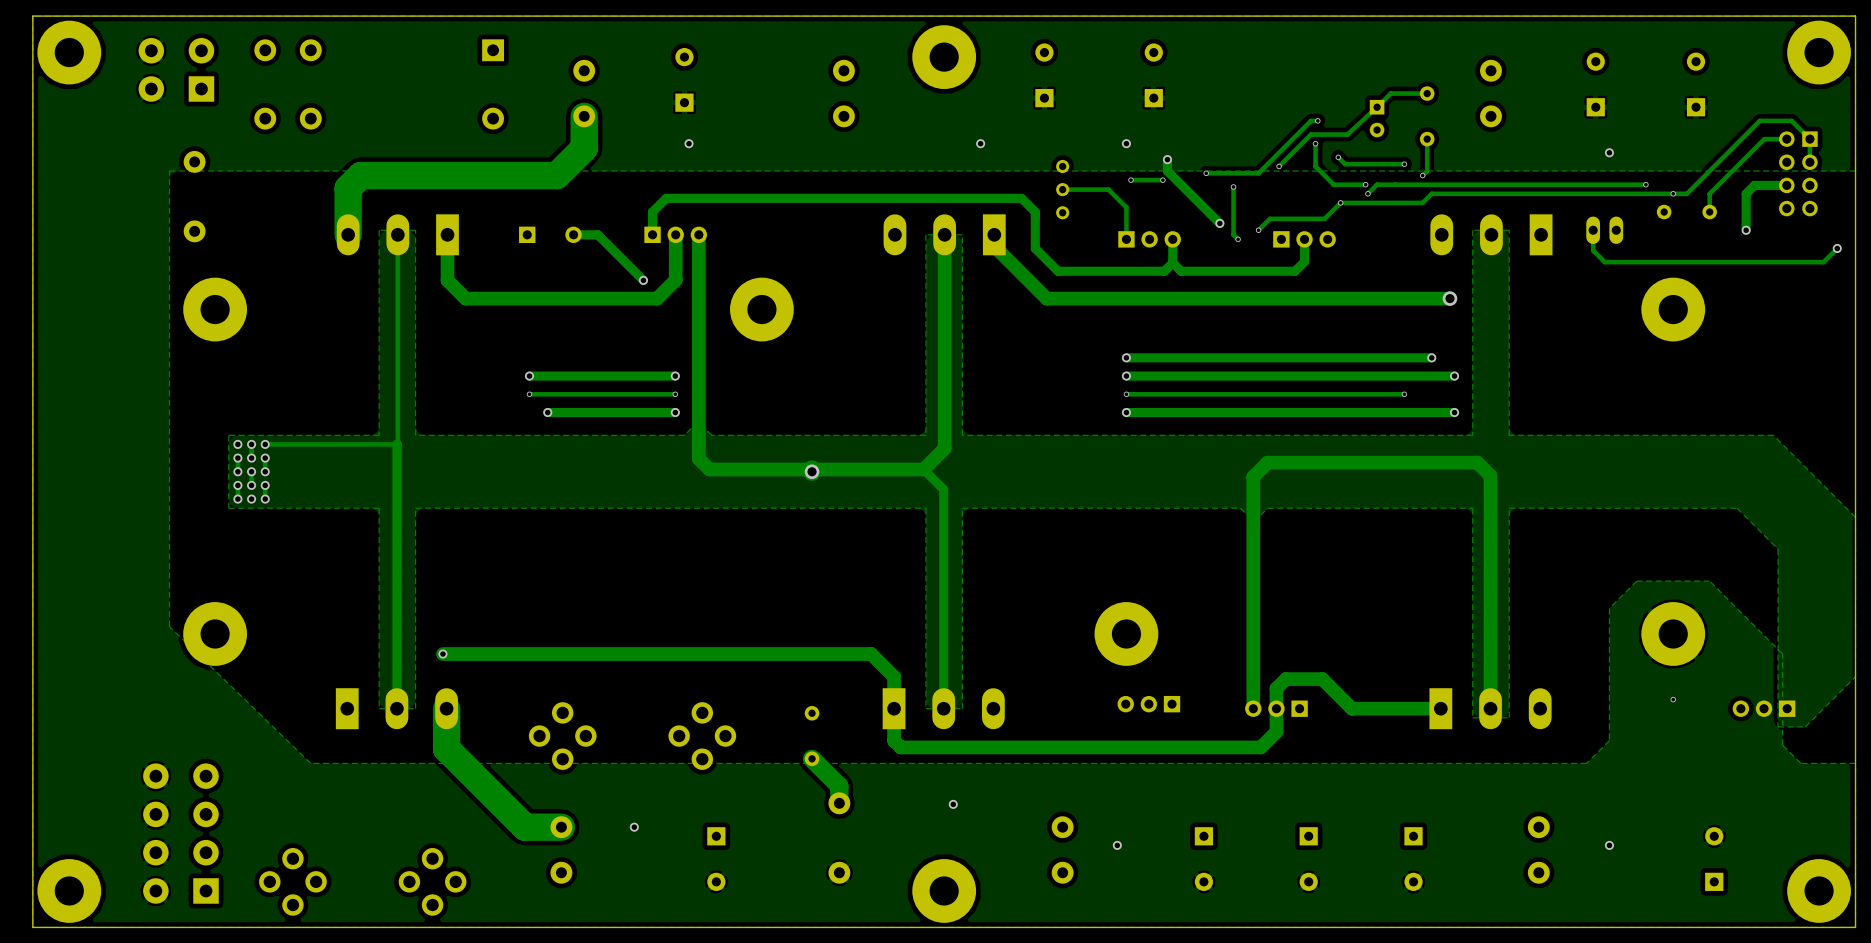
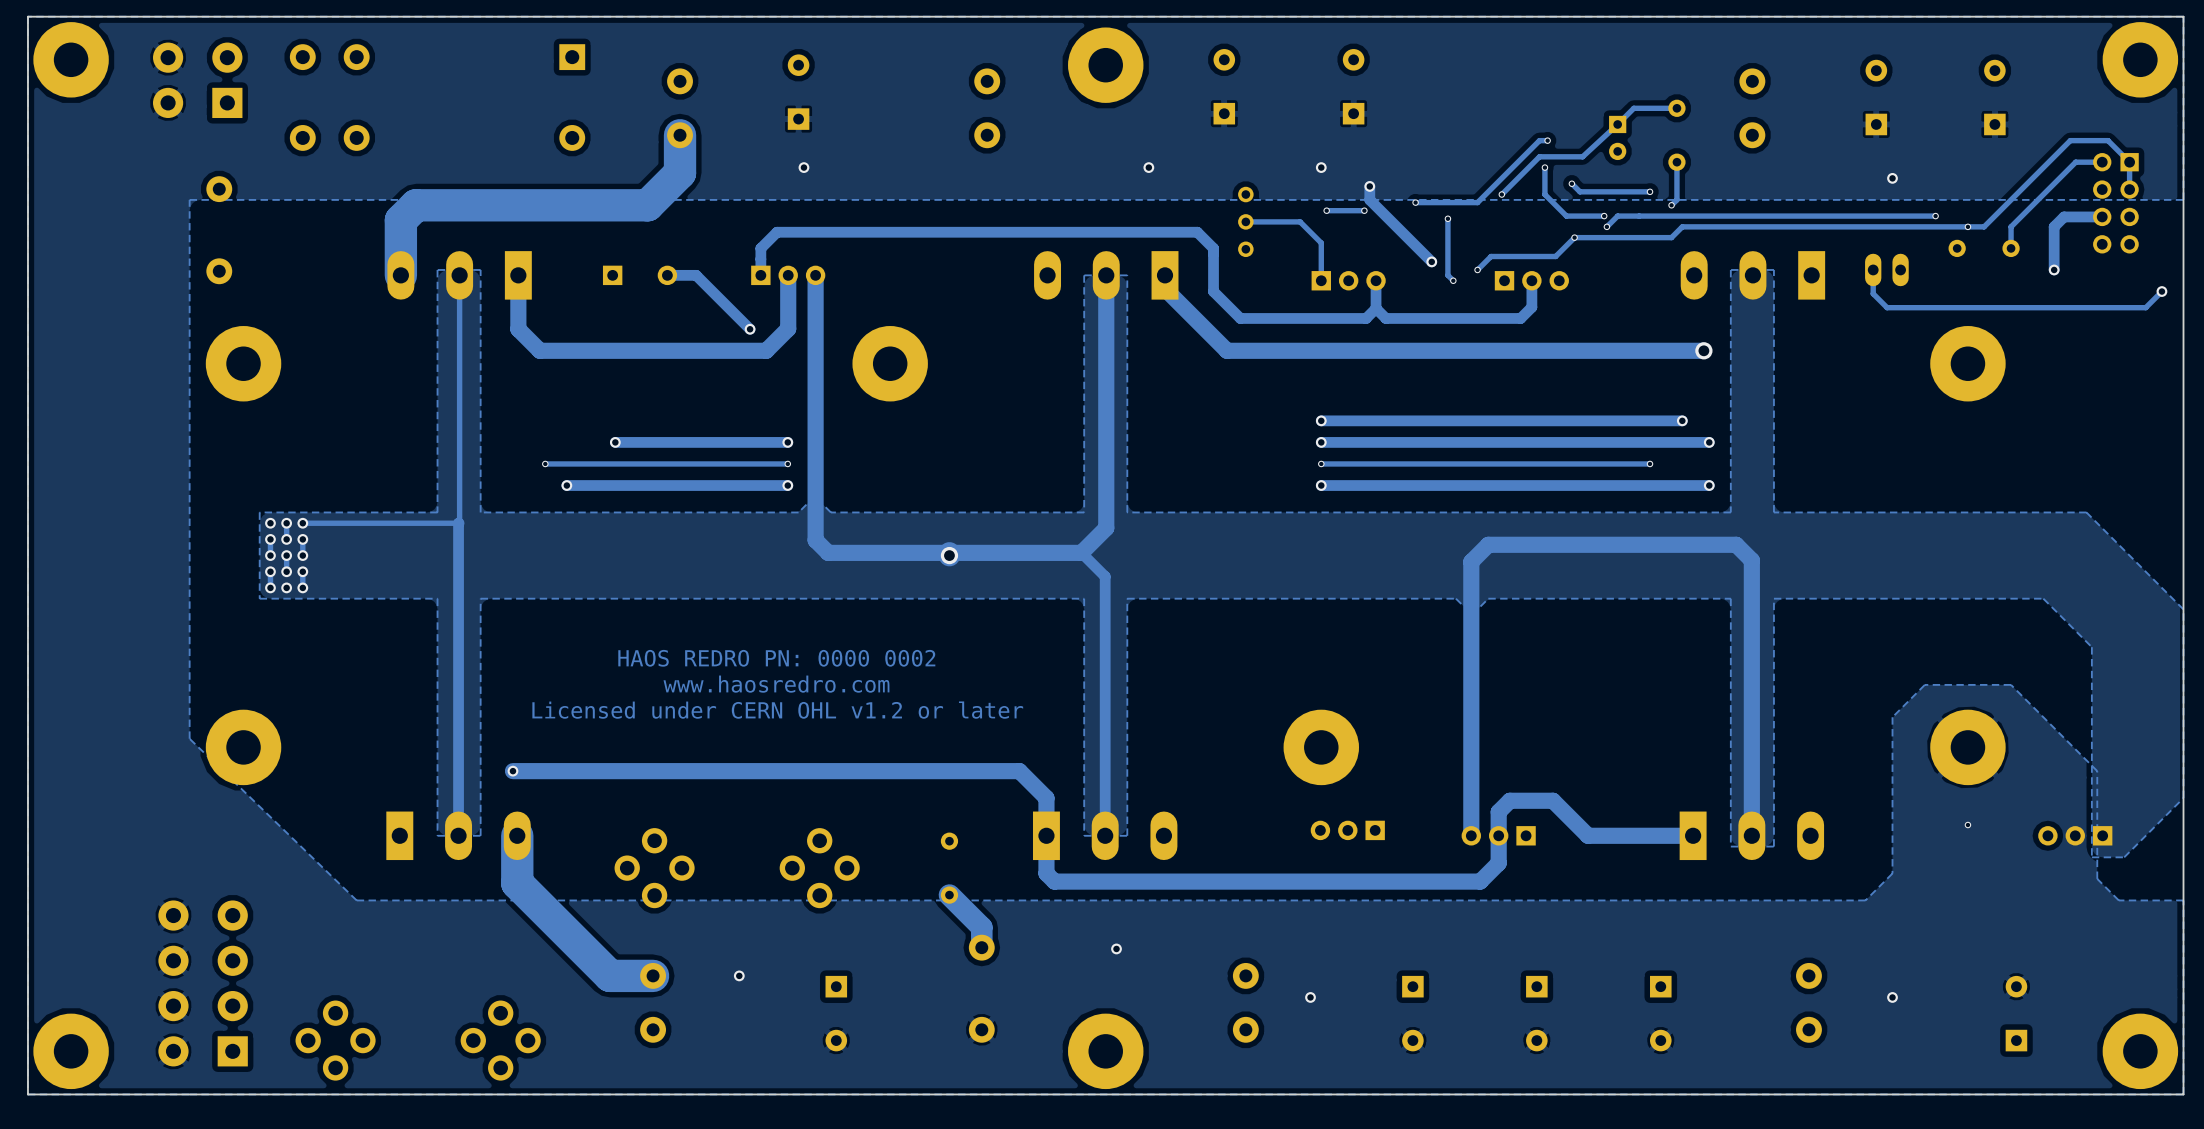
via: none -> (545, 463)
track: none -> (615, 463) (545, 463)
via: (529, 394) -> none
via: none -> (566, 485)
track: none -> (636, 485) (566, 485)
via: (547, 412) -> none
text: none -> HAOS REDRO PN: 0000 0002 (776, 658)
text: none -> www.haosredro.com (776, 684)
text: none -> Licensed under CERN OHL v1.2 or later (777, 710)

